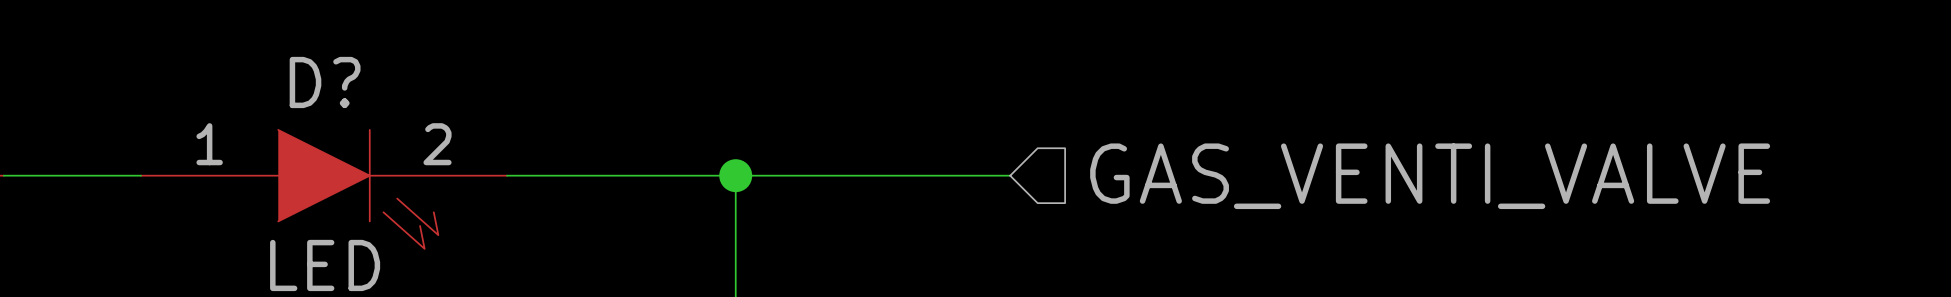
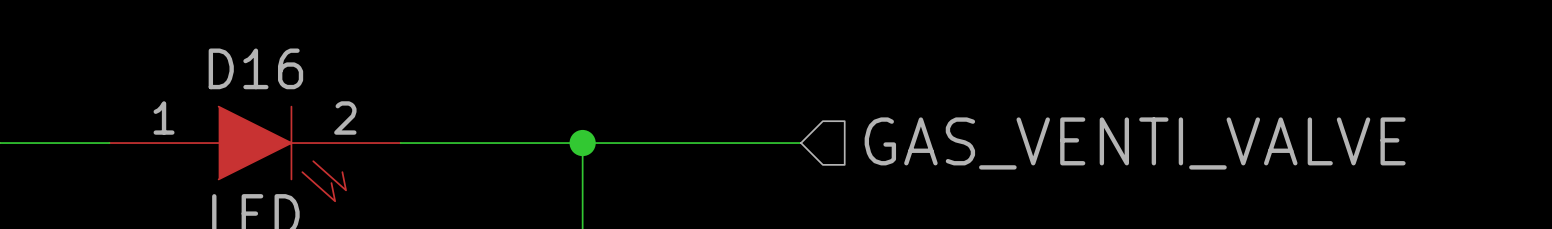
D? name: D? (325, 82) -> D16 (255, 68)

